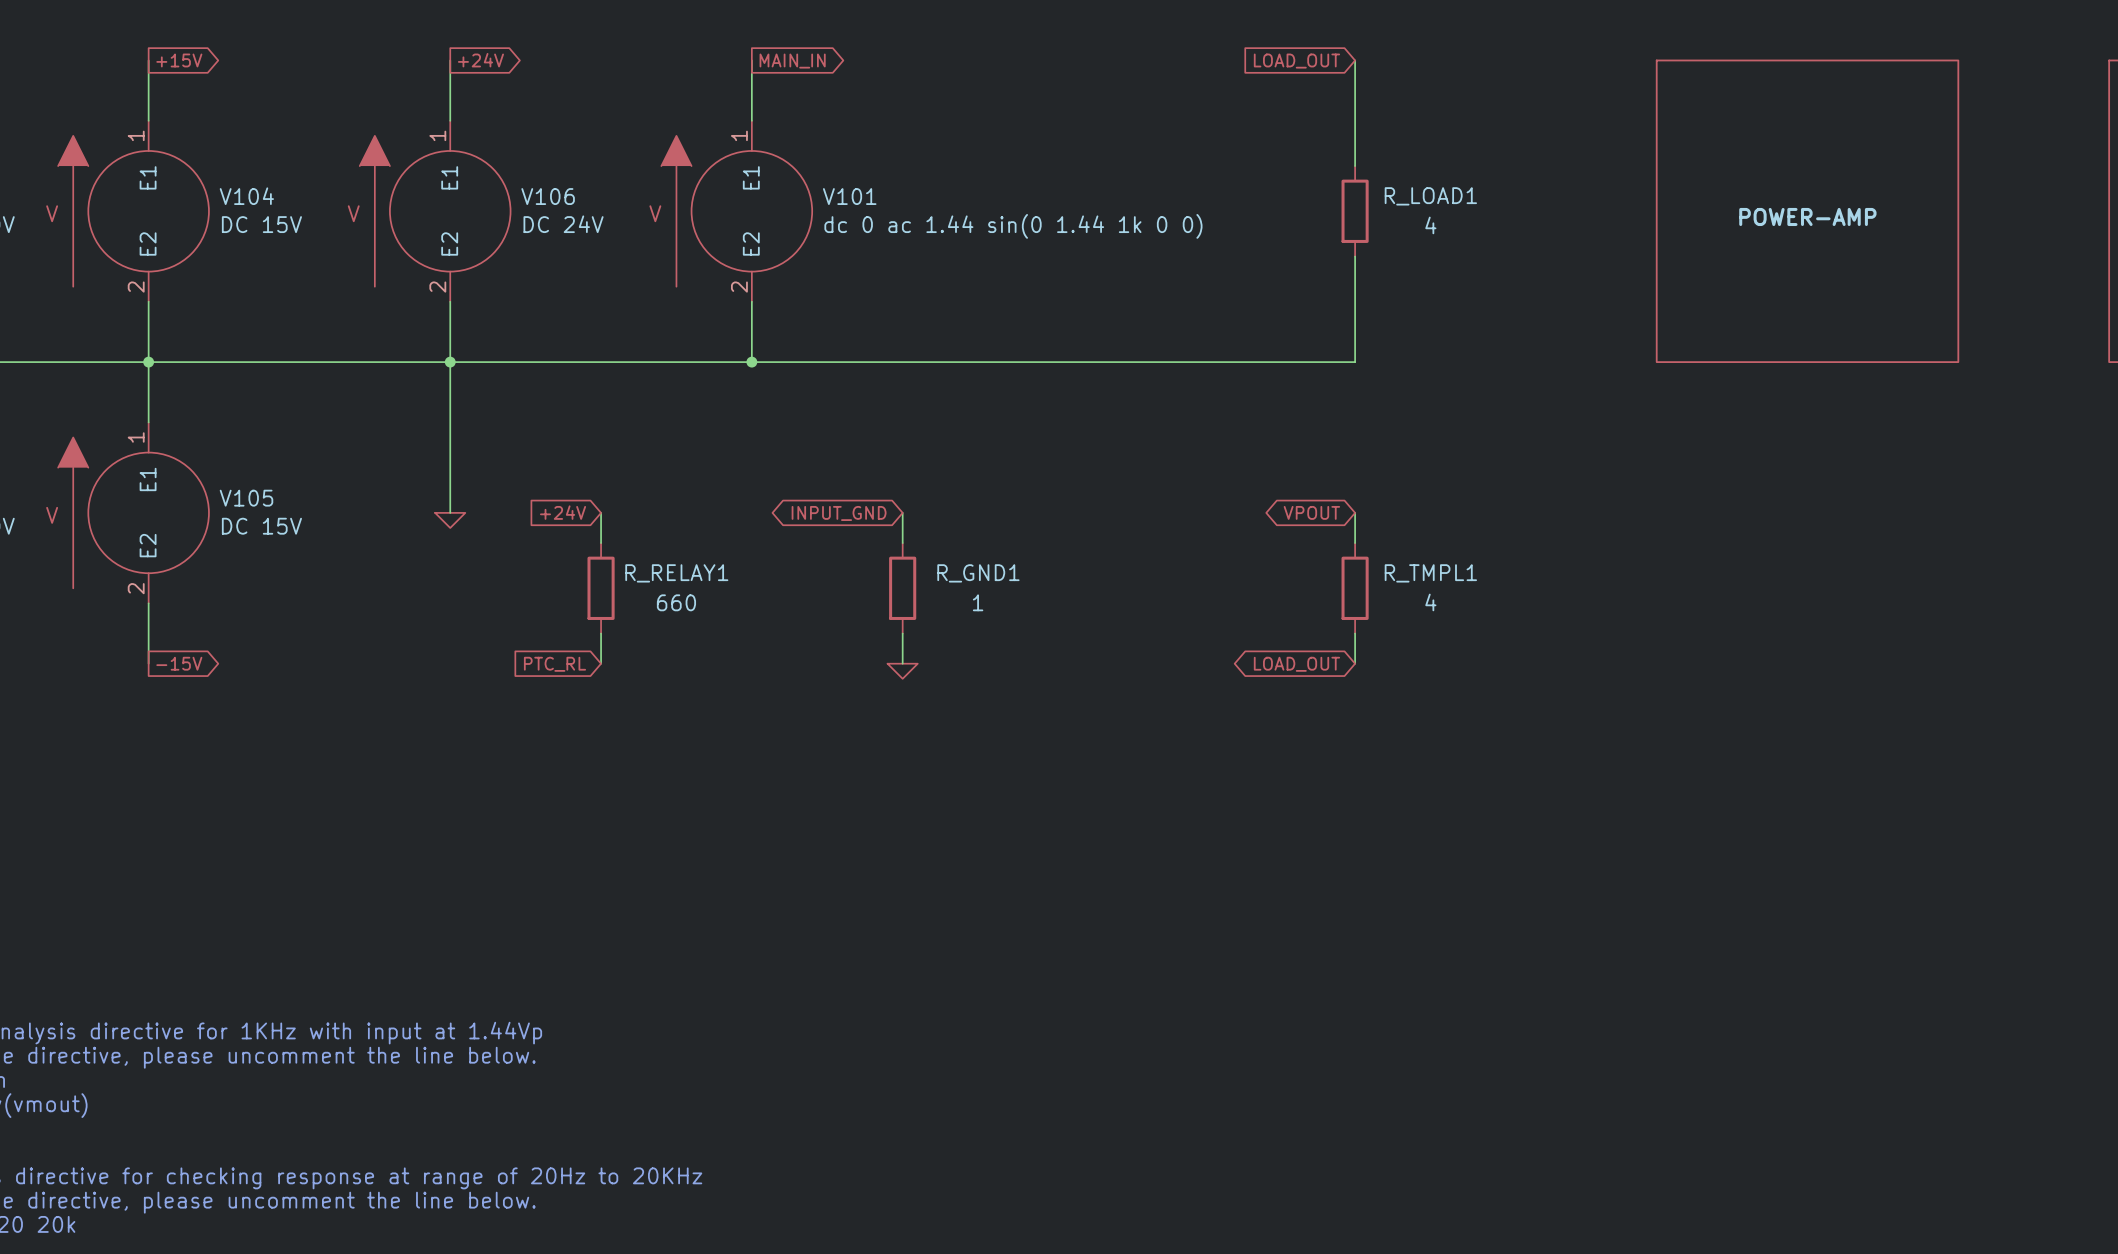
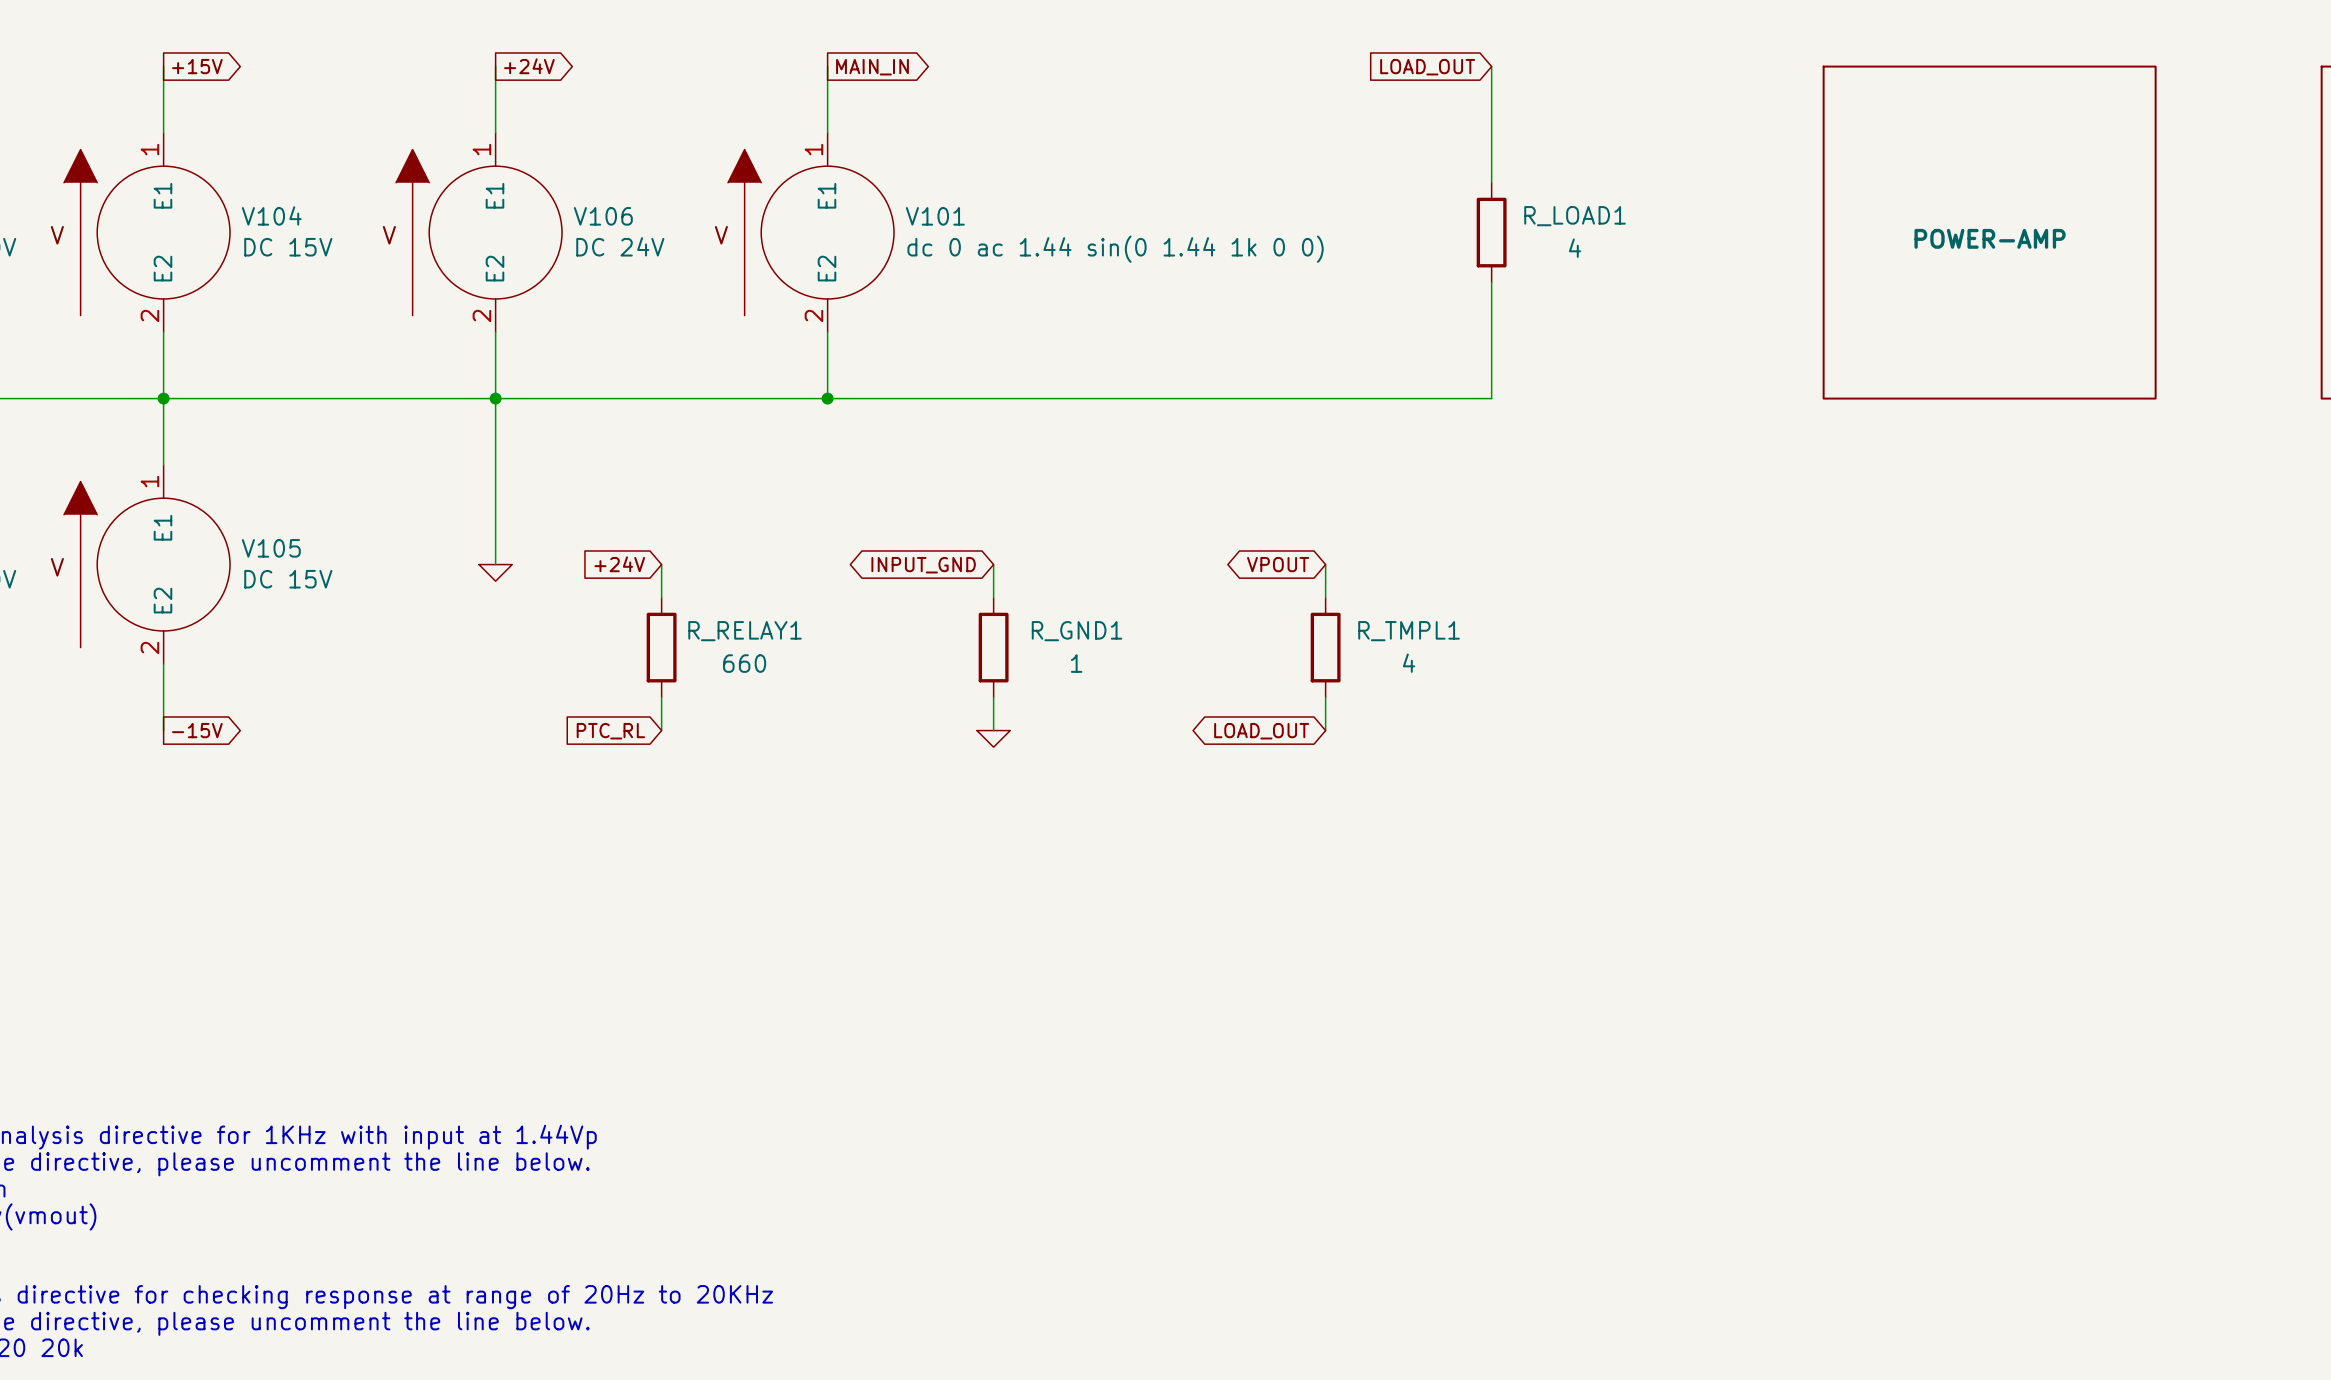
global label position: VPOUT (1311, 512) -> VPOUT (1278, 564)
wire: (1355, 512) (1355, 543) -> (1325, 564) (1325, 597)
R_TMPL1 position: (1355, 588) -> (1325, 647)
wire: (1355, 633) (1355, 663) -> (1325, 697) (1325, 730)
global label position: LOAD_OUT (1296, 664) -> LOAD_OUT (1261, 731)

